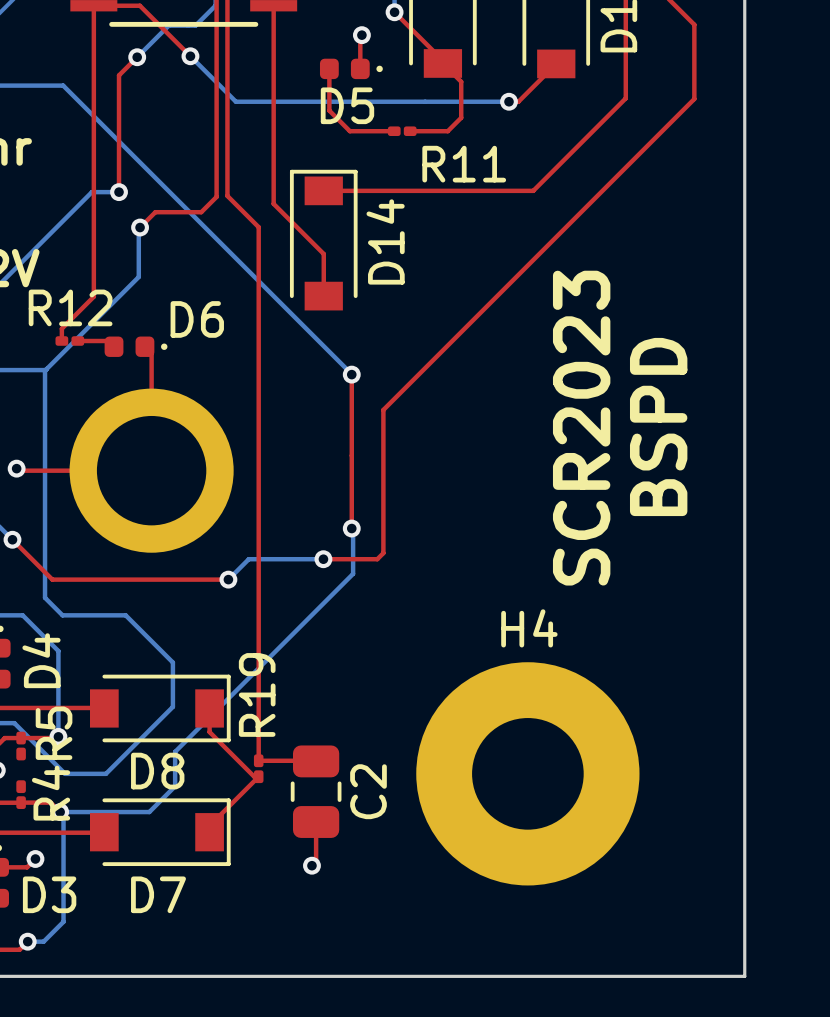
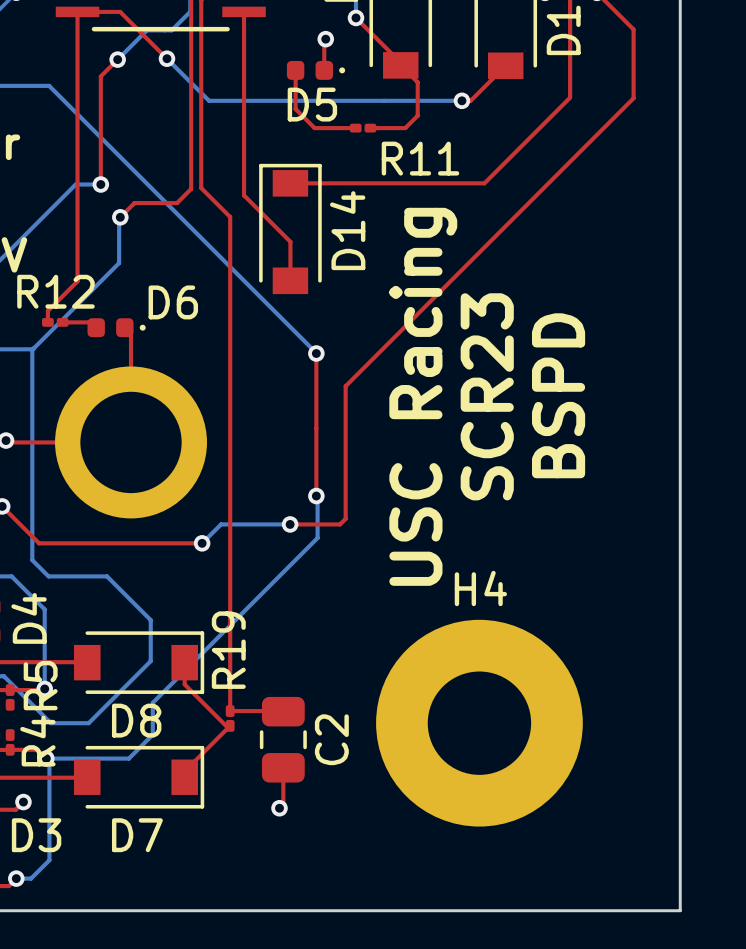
text: none -> USC Racing (423, 396)
text position: BSPD (658, 426) -> BSPD (558, 395)
text: SCR2023 (581, 428) -> SCR23 (487, 396)

